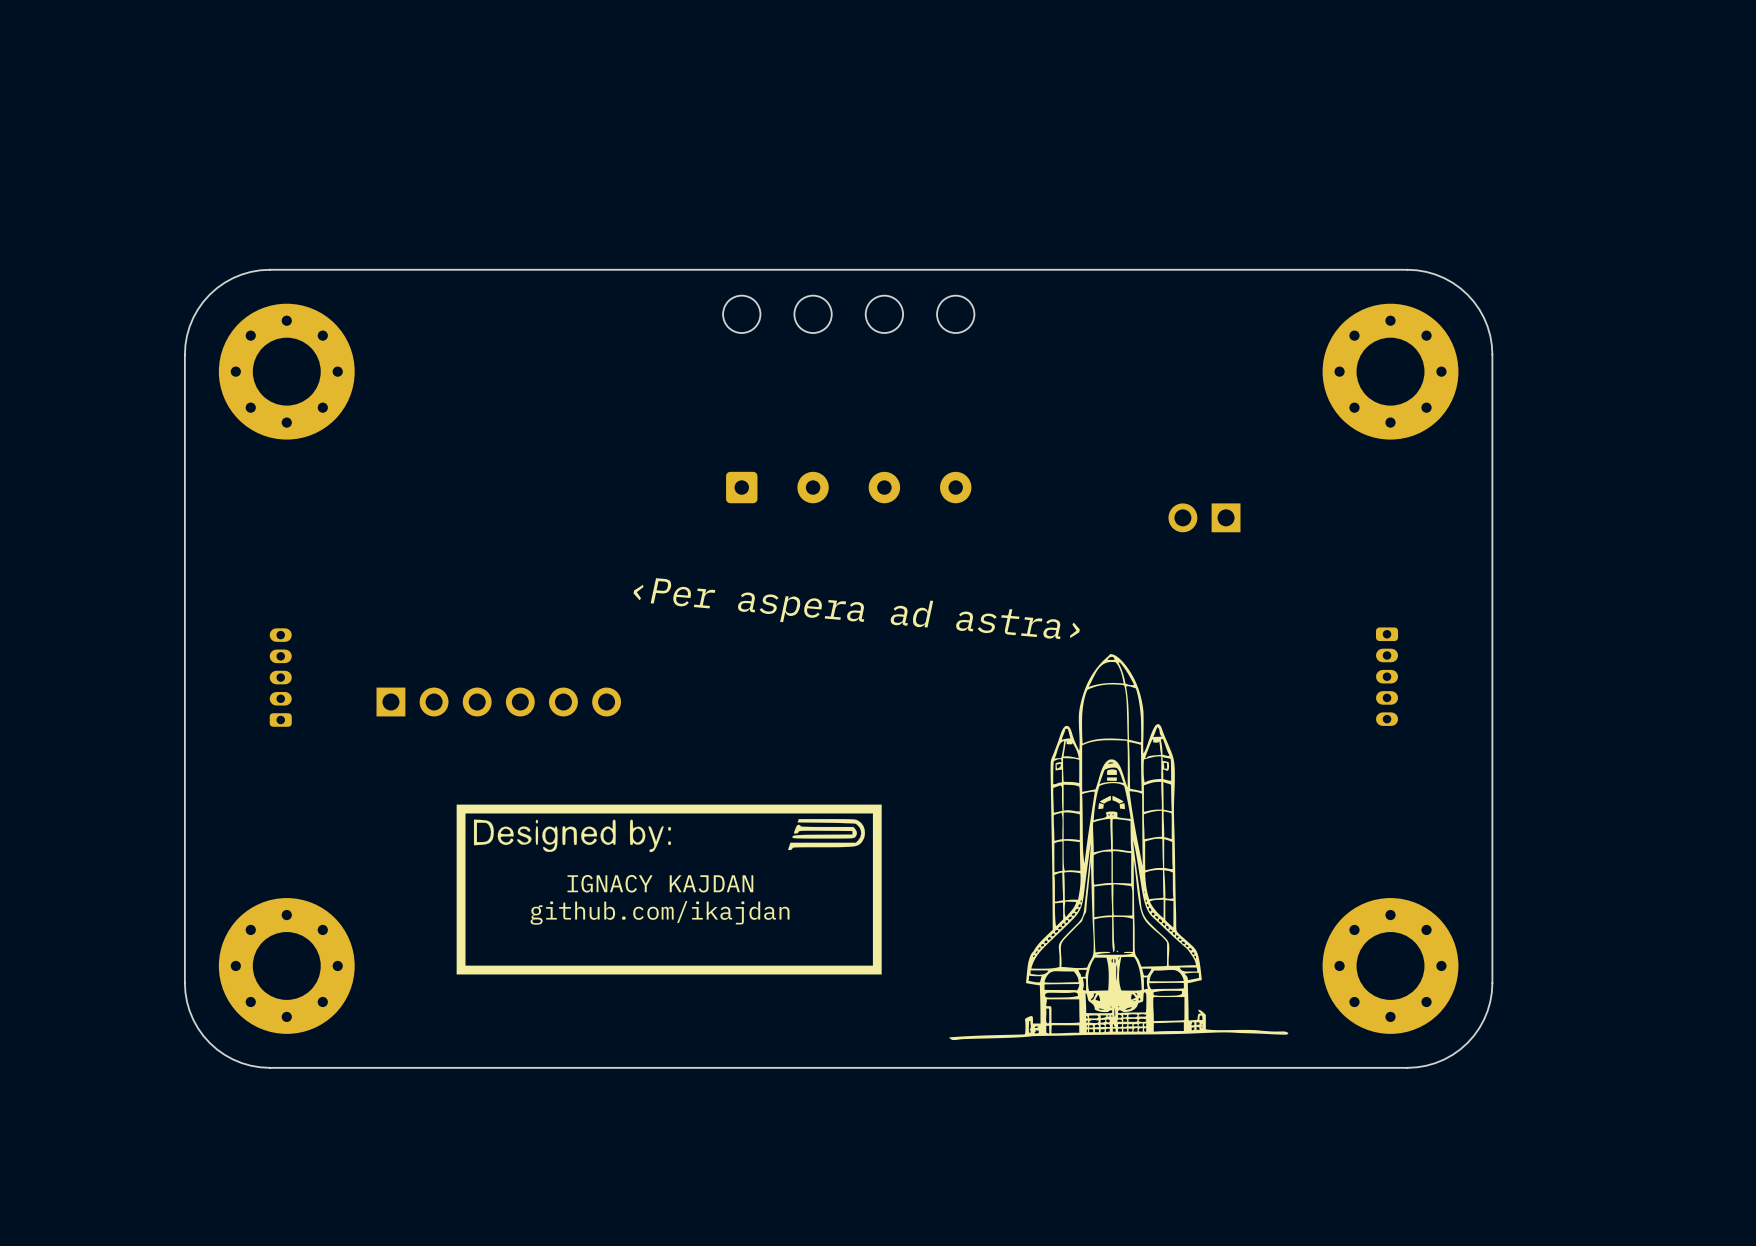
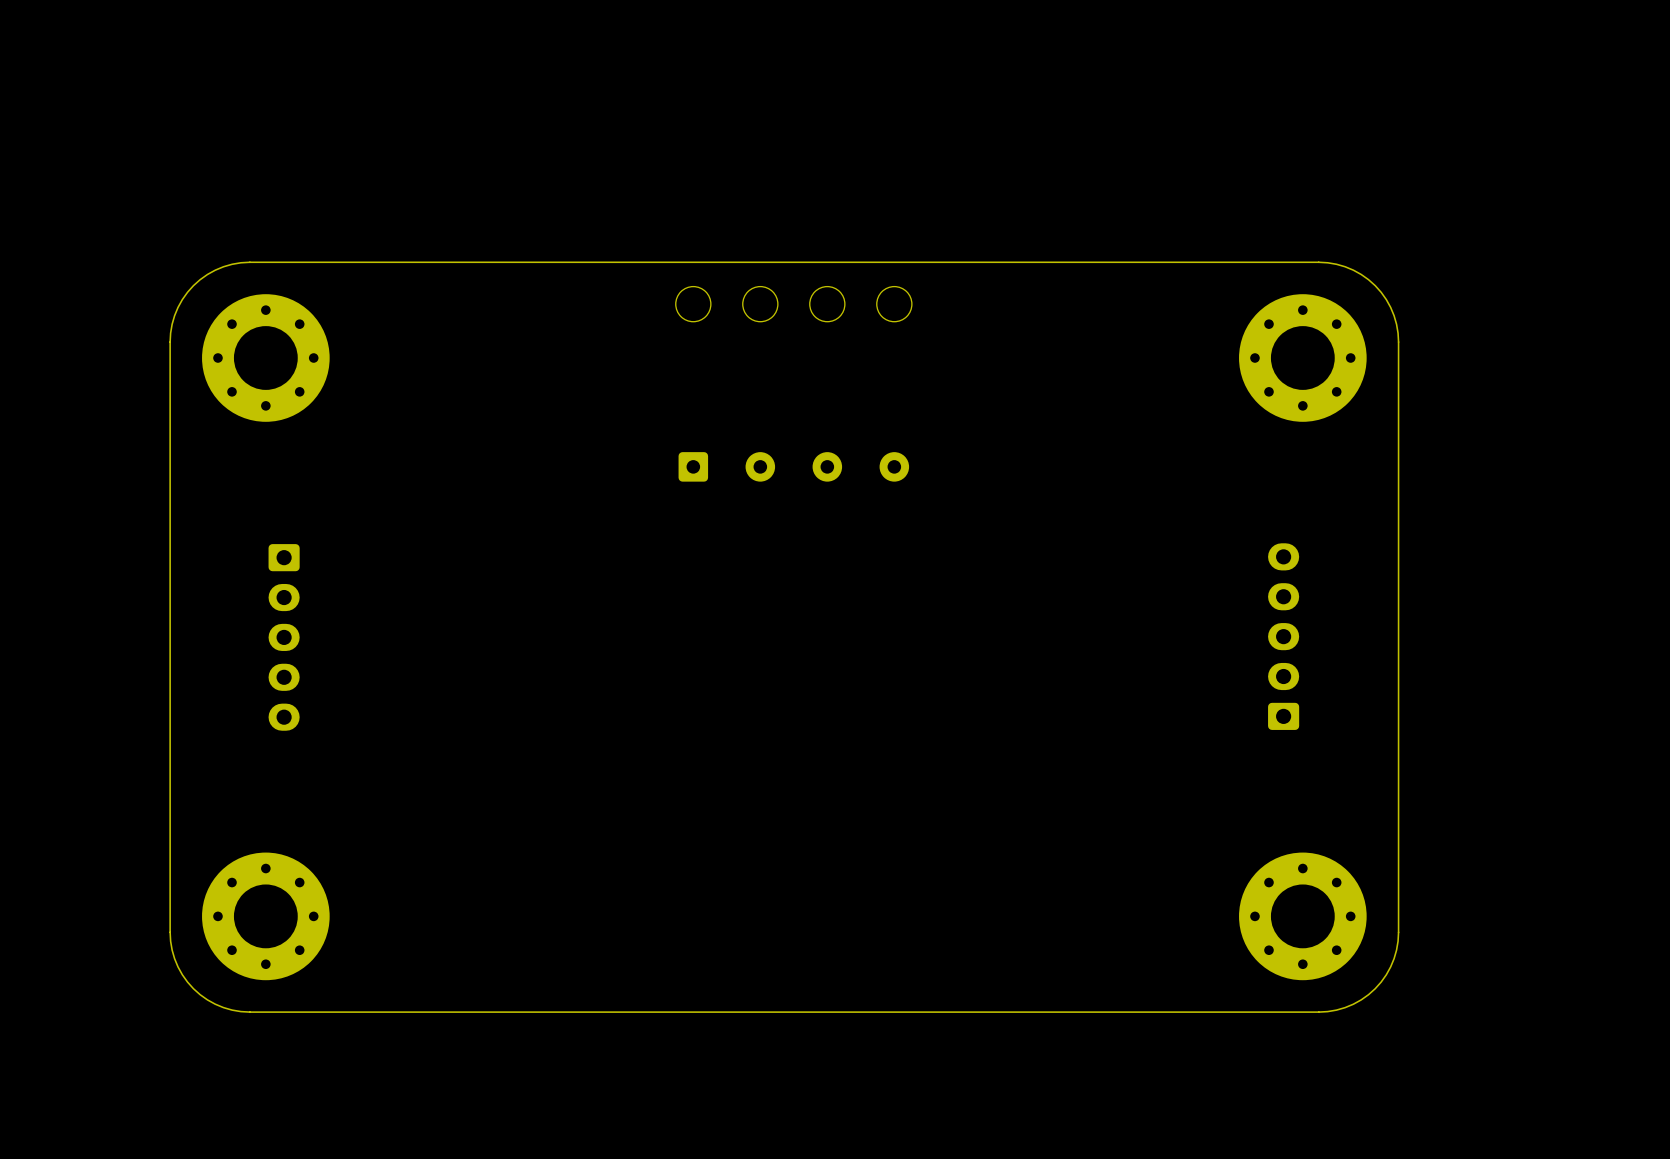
part: (1204, 517) -> none
text: ‹Per aspera ad astra› (856, 608) -> none
drawing: [949, 654, 1289, 1041] -> none
part: none -> (1283, 636)
part: none -> (284, 637)
part: (1387, 676) -> none
part: (280, 677) -> none
part: (498, 702) -> none
drawing: [456, 804, 882, 975] -> none
text: IGNACY KAJDAN (660, 883) -> none
text: github.com/ikajdan (660, 912) -> none

